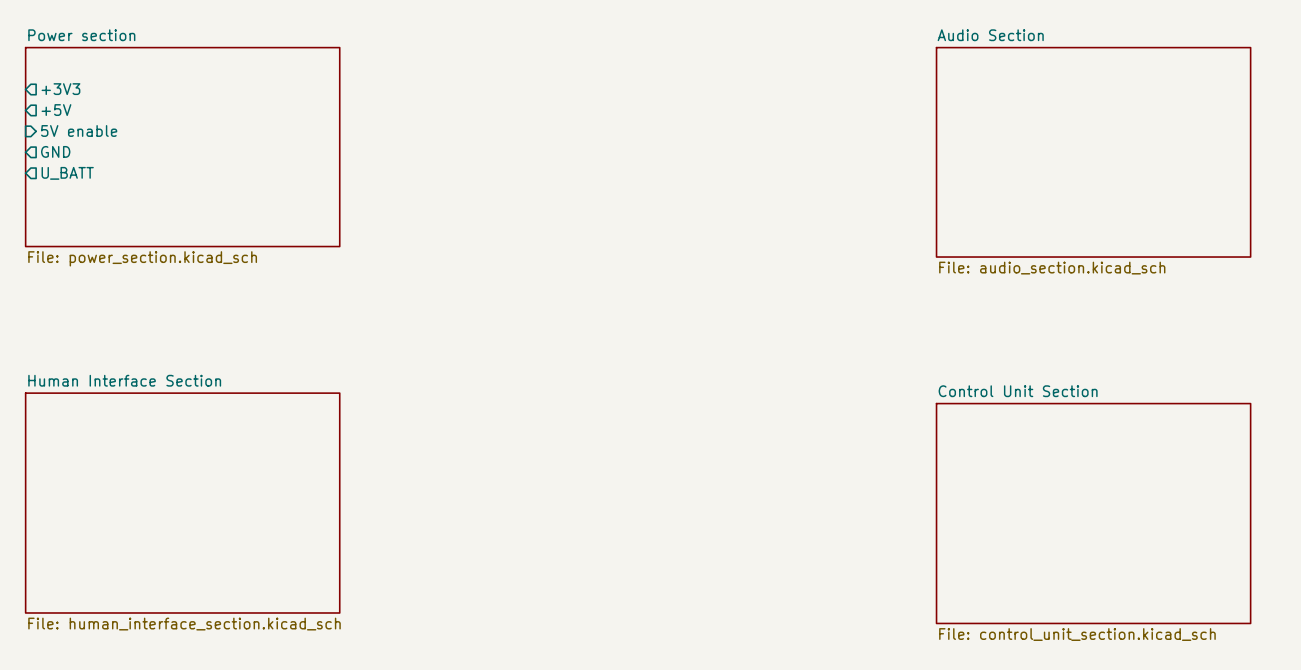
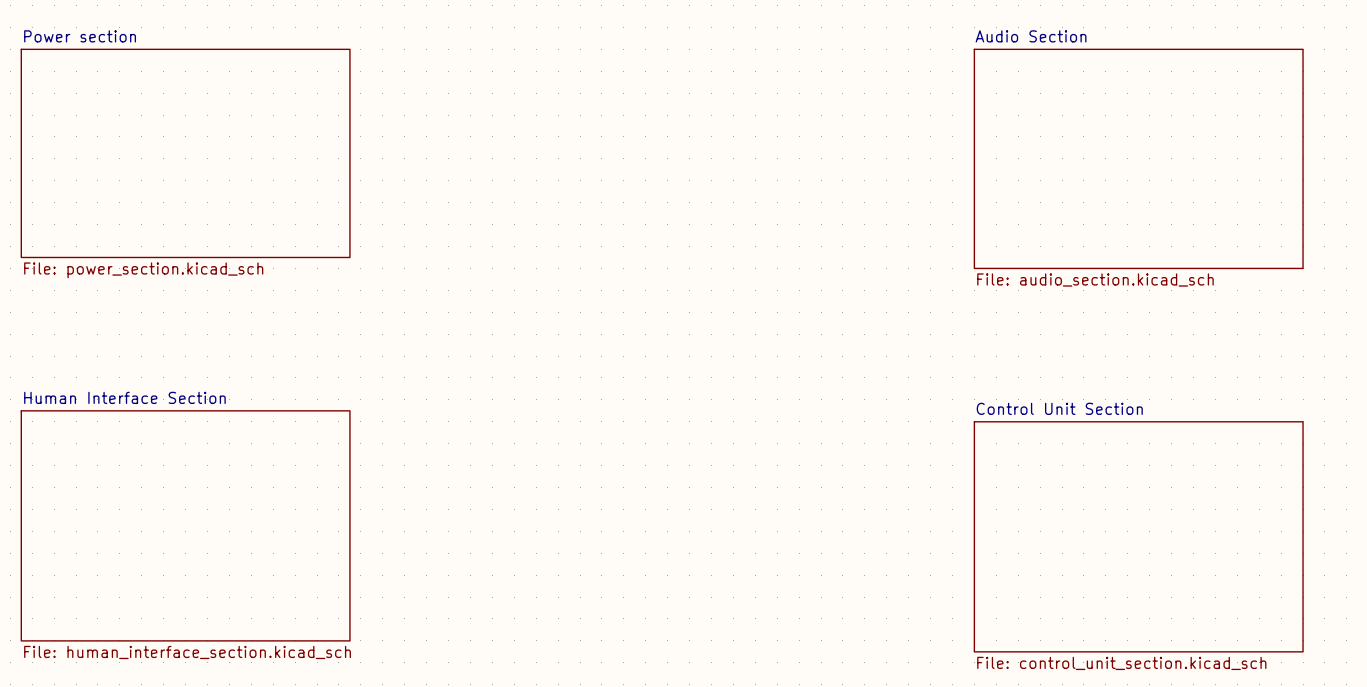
sheet pin: +3V3 (60, 89) -> none
sheet pin: +5V (56, 110) -> none
sheet pin: 5V enable (79, 130) -> none
sheet pin: GND (55, 151) -> none
sheet pin: U_BATT (67, 173) -> none

